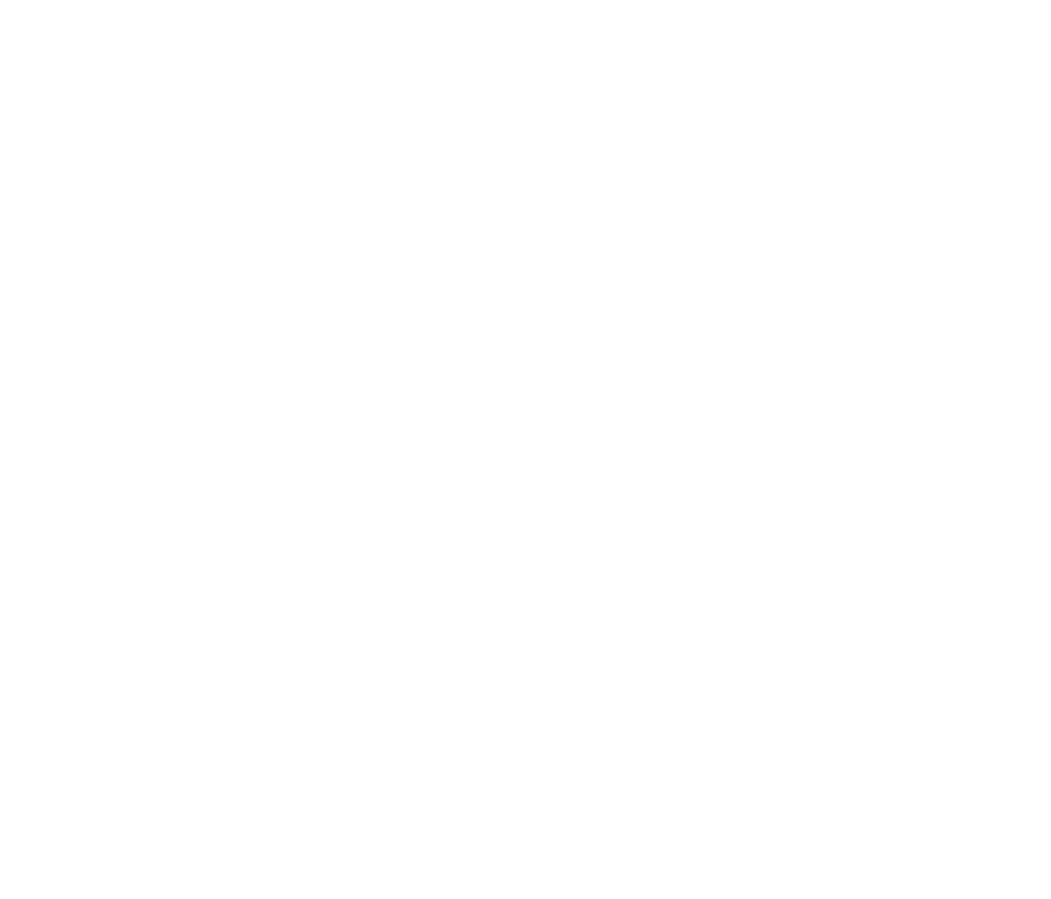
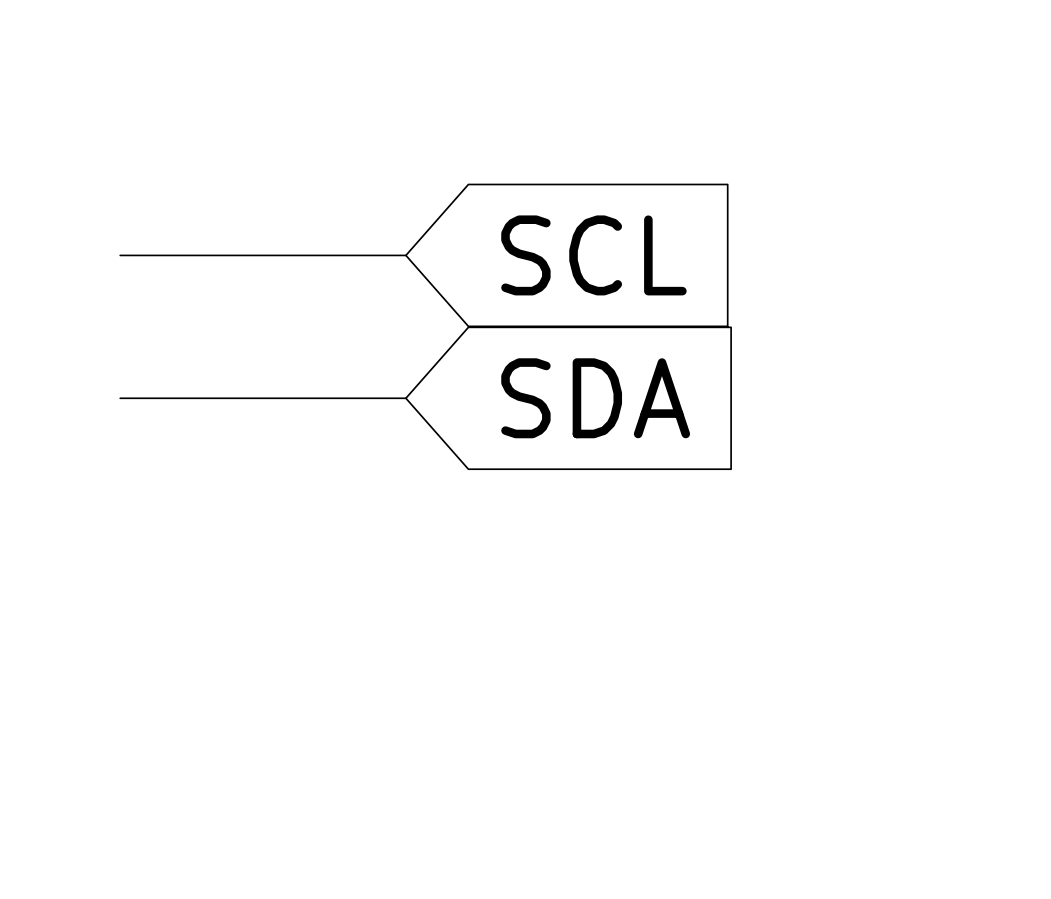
wire: none -> (120, 255) (405, 255)
global label: none -> SCL (593, 255)
wire: none -> (120, 398) (405, 398)
global label: none -> SDA (595, 398)

